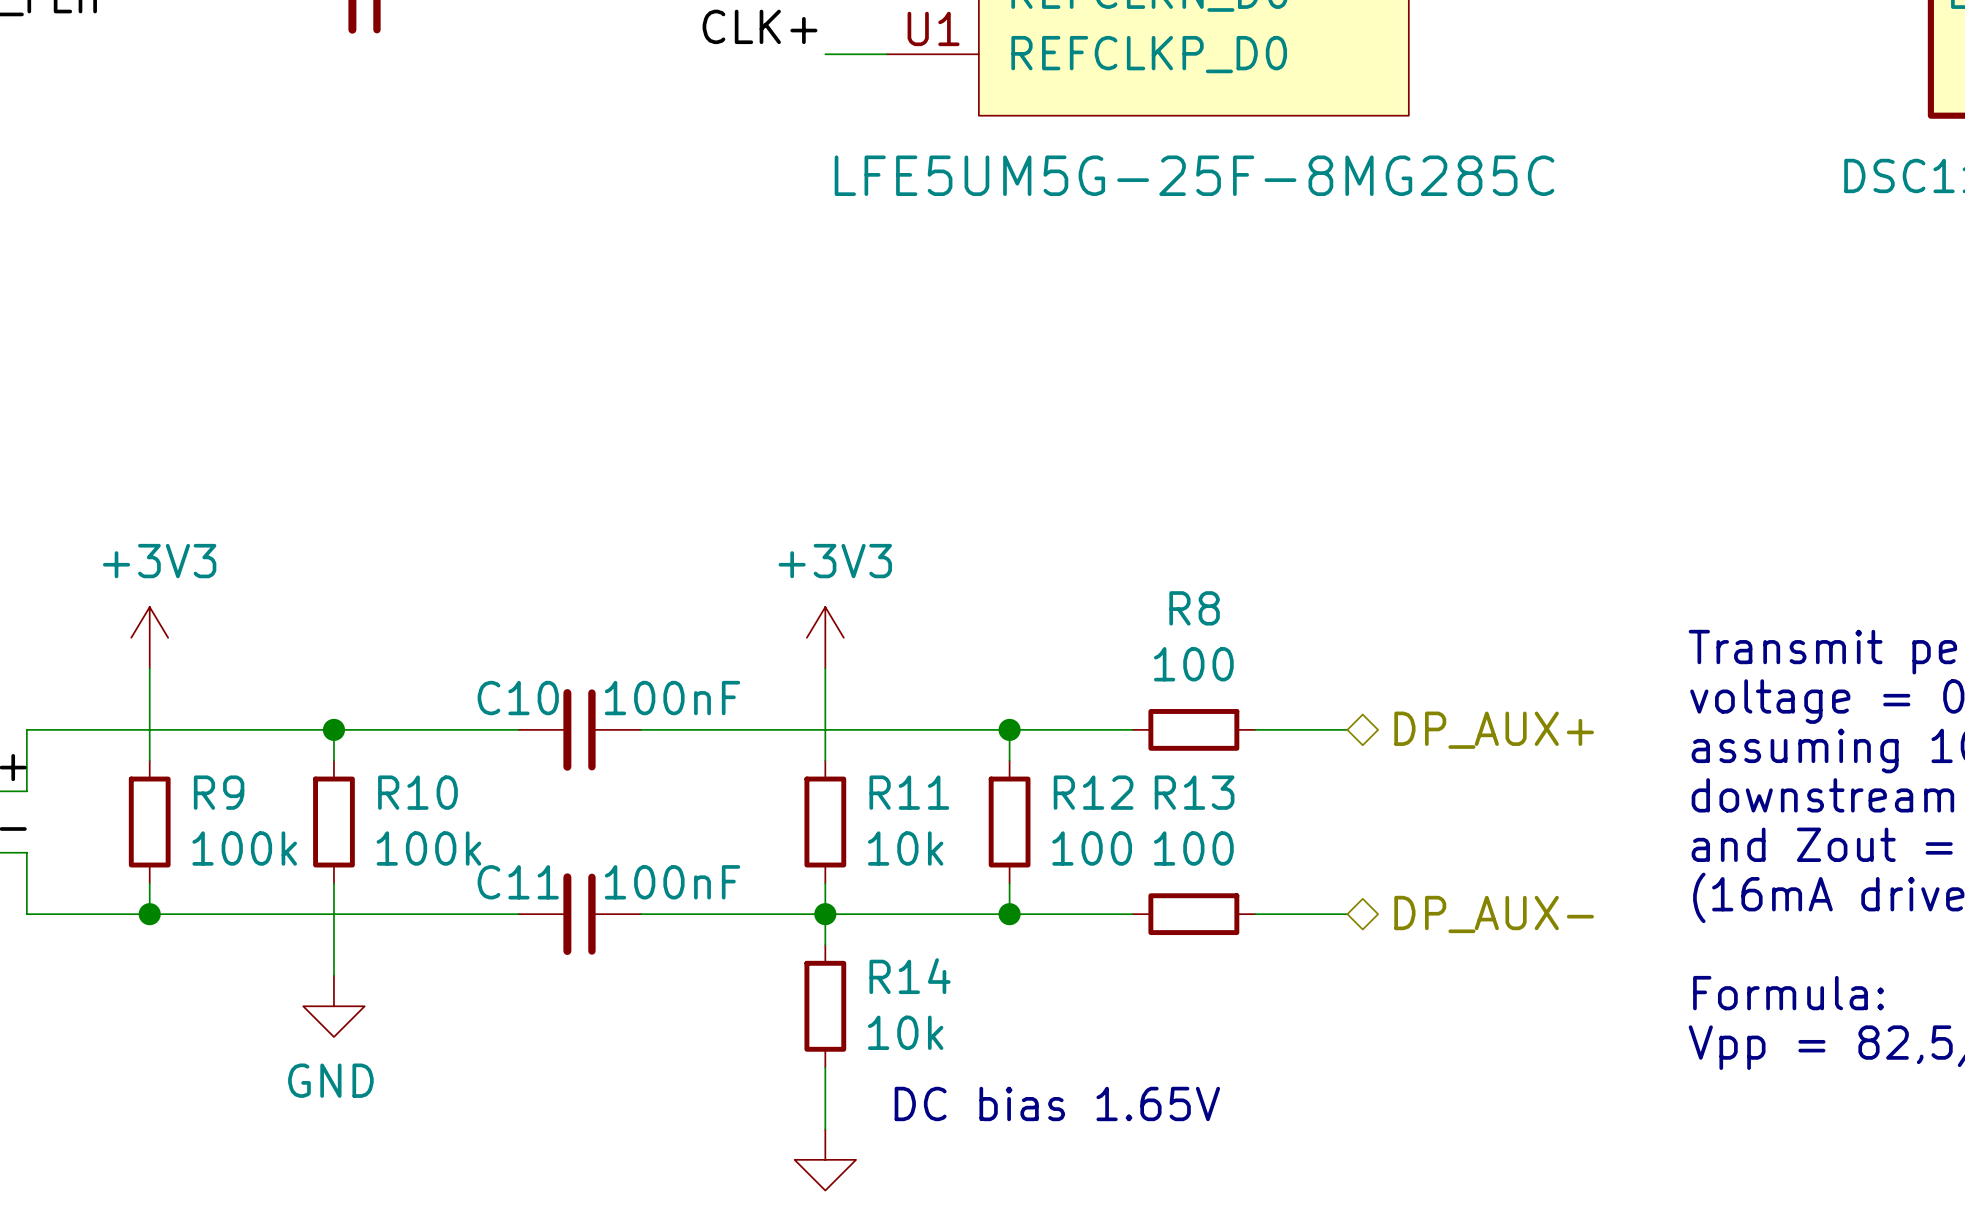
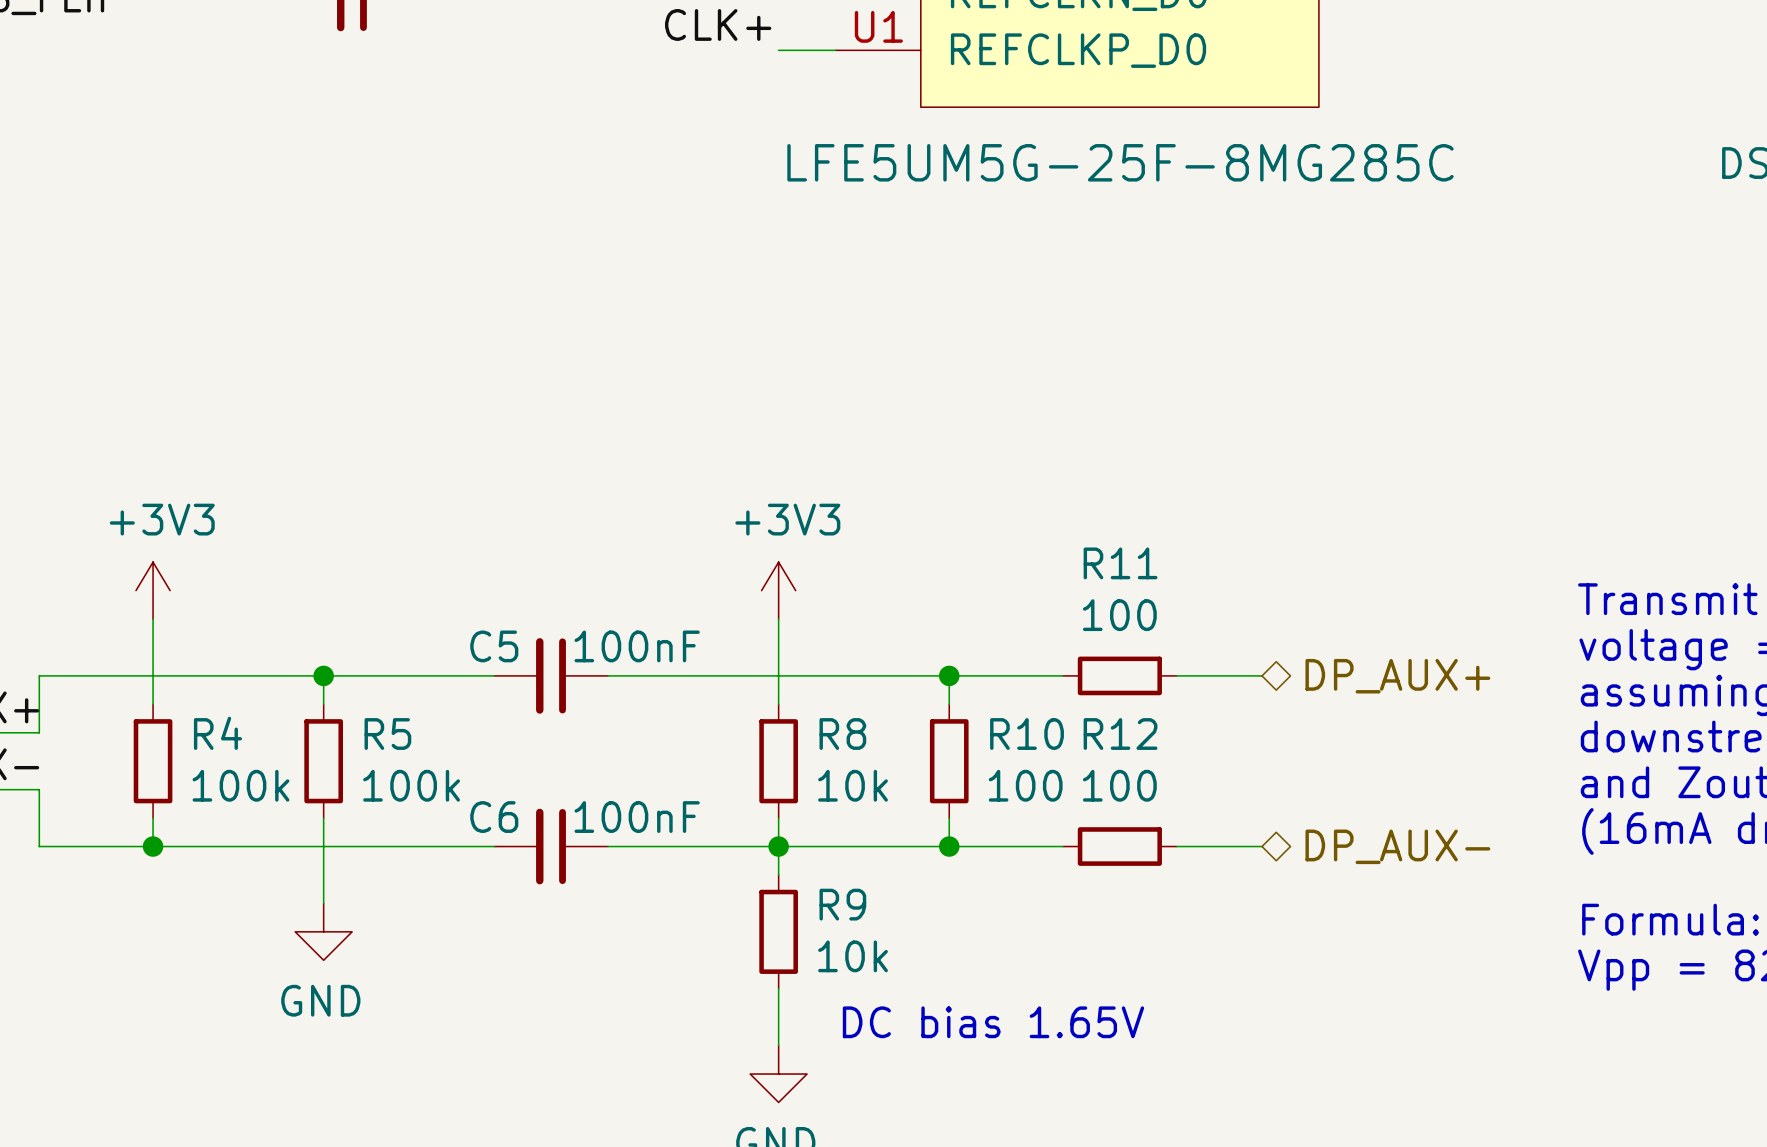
R8 name: R8 (1194, 608) -> R11 (1120, 563)
C10 name: C10 (518, 698) -> C5 (494, 646)
R9 name: R9 (219, 792) -> R4 (217, 733)
R10 name: R10 (417, 792) -> R5 (387, 734)
R11 name: R11 (909, 792) -> R8 (842, 734)
R12 name: R12 (1093, 792) -> R10 (1027, 734)
R13 name: R13 (1194, 792) -> R12 (1120, 734)
C11 name: C11 (518, 882) -> C6 (494, 817)
R14 name: R14 (910, 976) -> R9 (842, 904)

